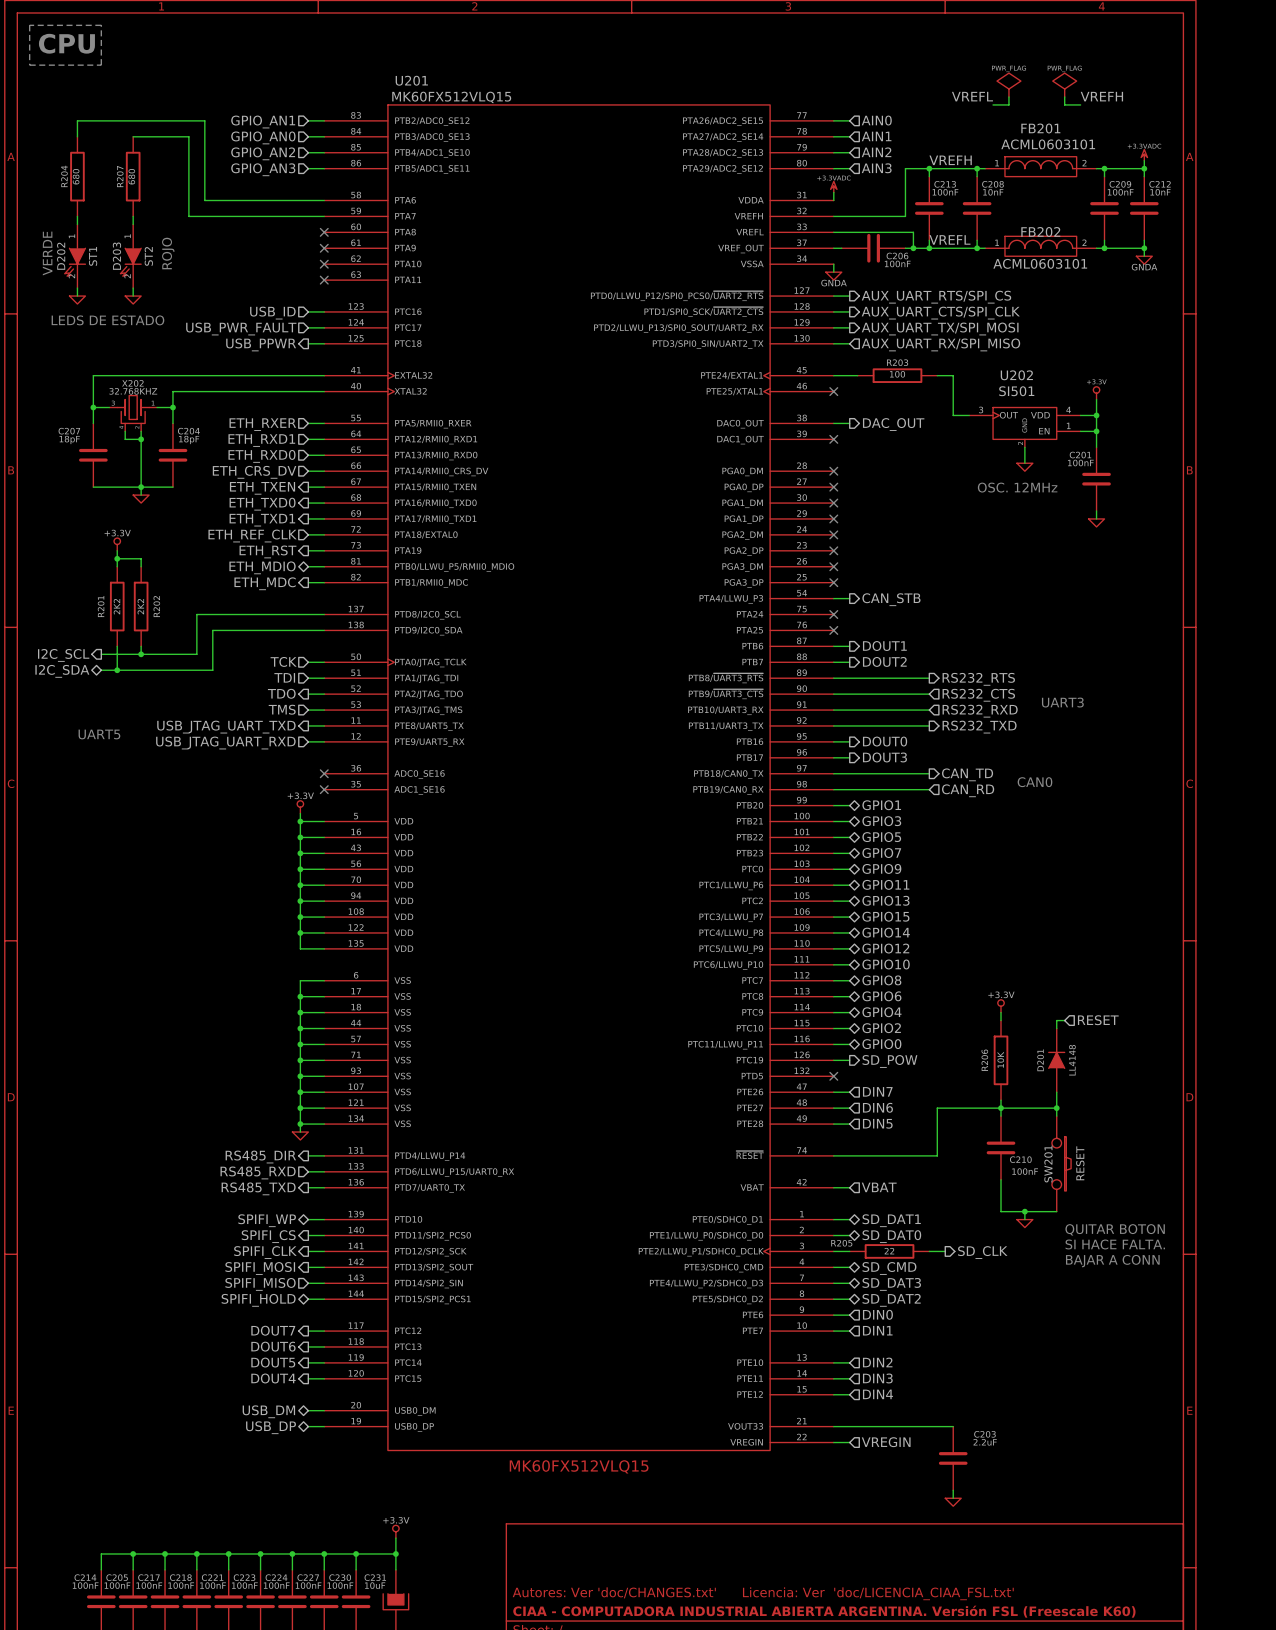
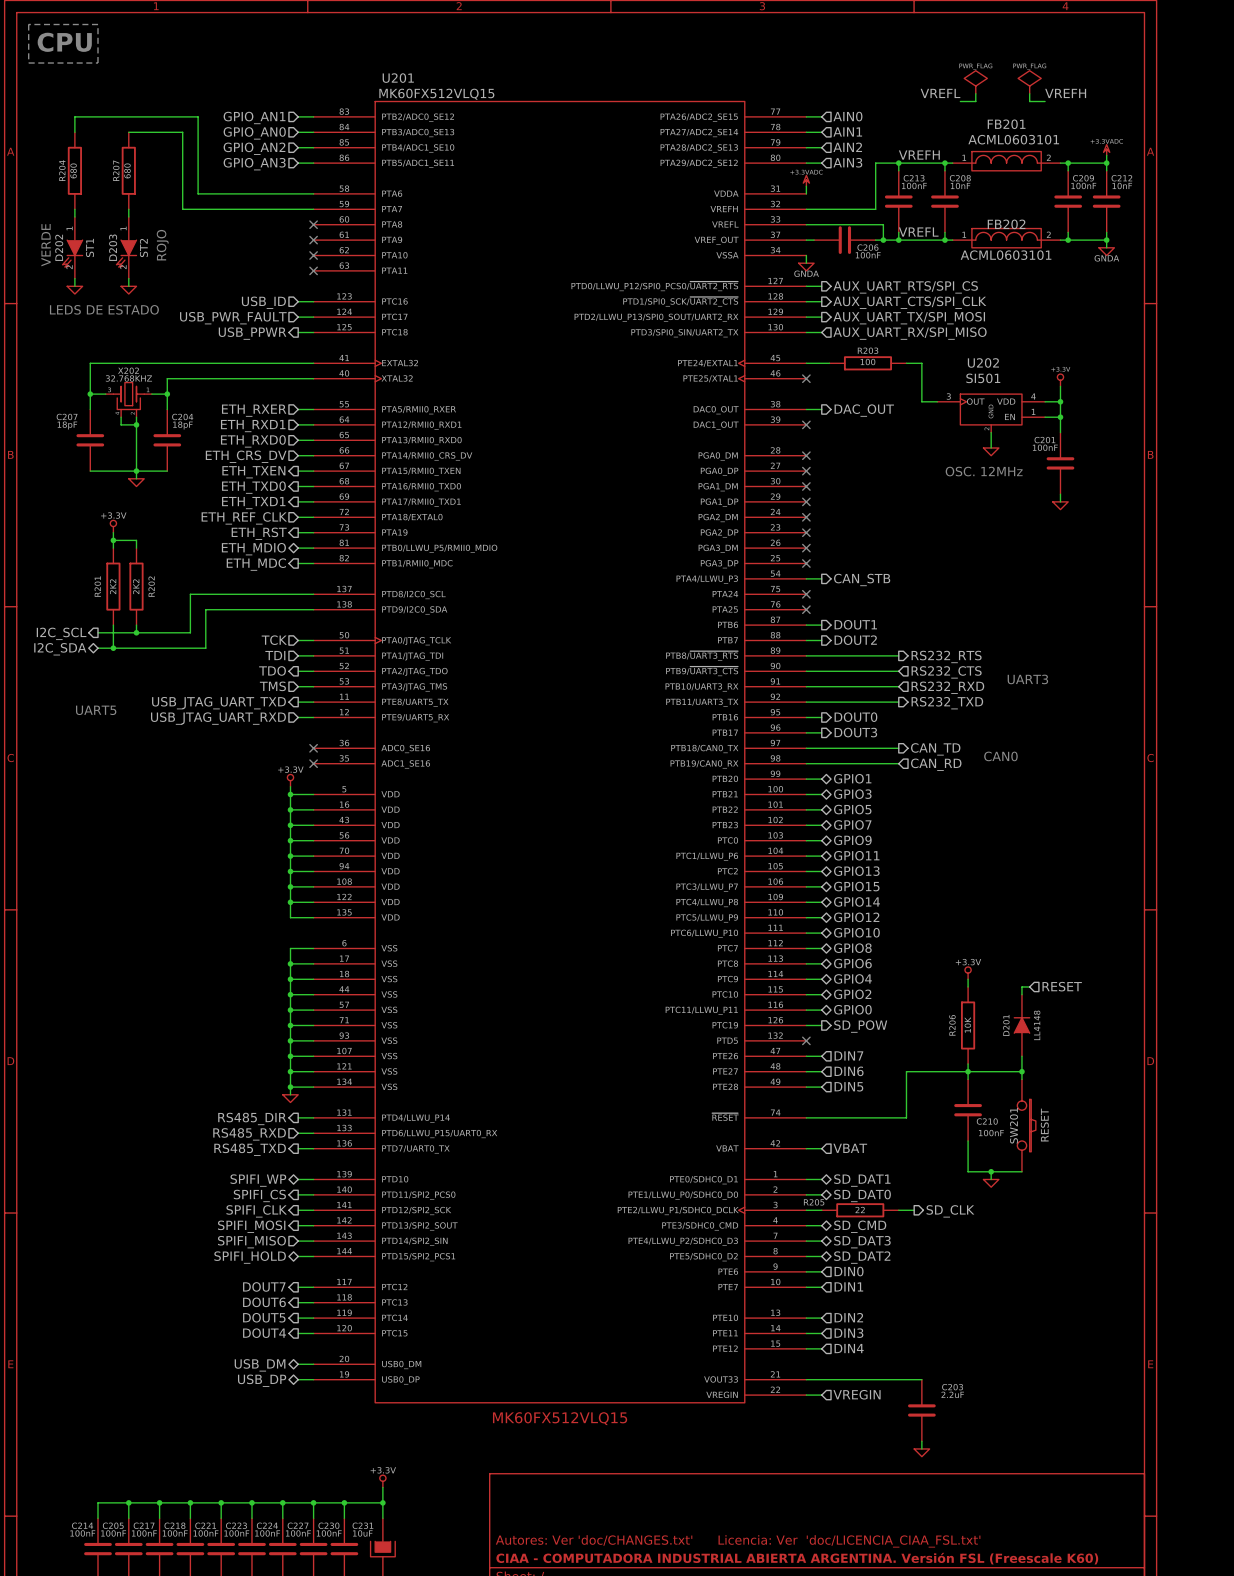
text: QUITAR BOTON (1115, 1229) -> none
text: SI HACE FALTA. (1115, 1244) -> none
text: BAJAR A CONN (1112, 1261) -> none

